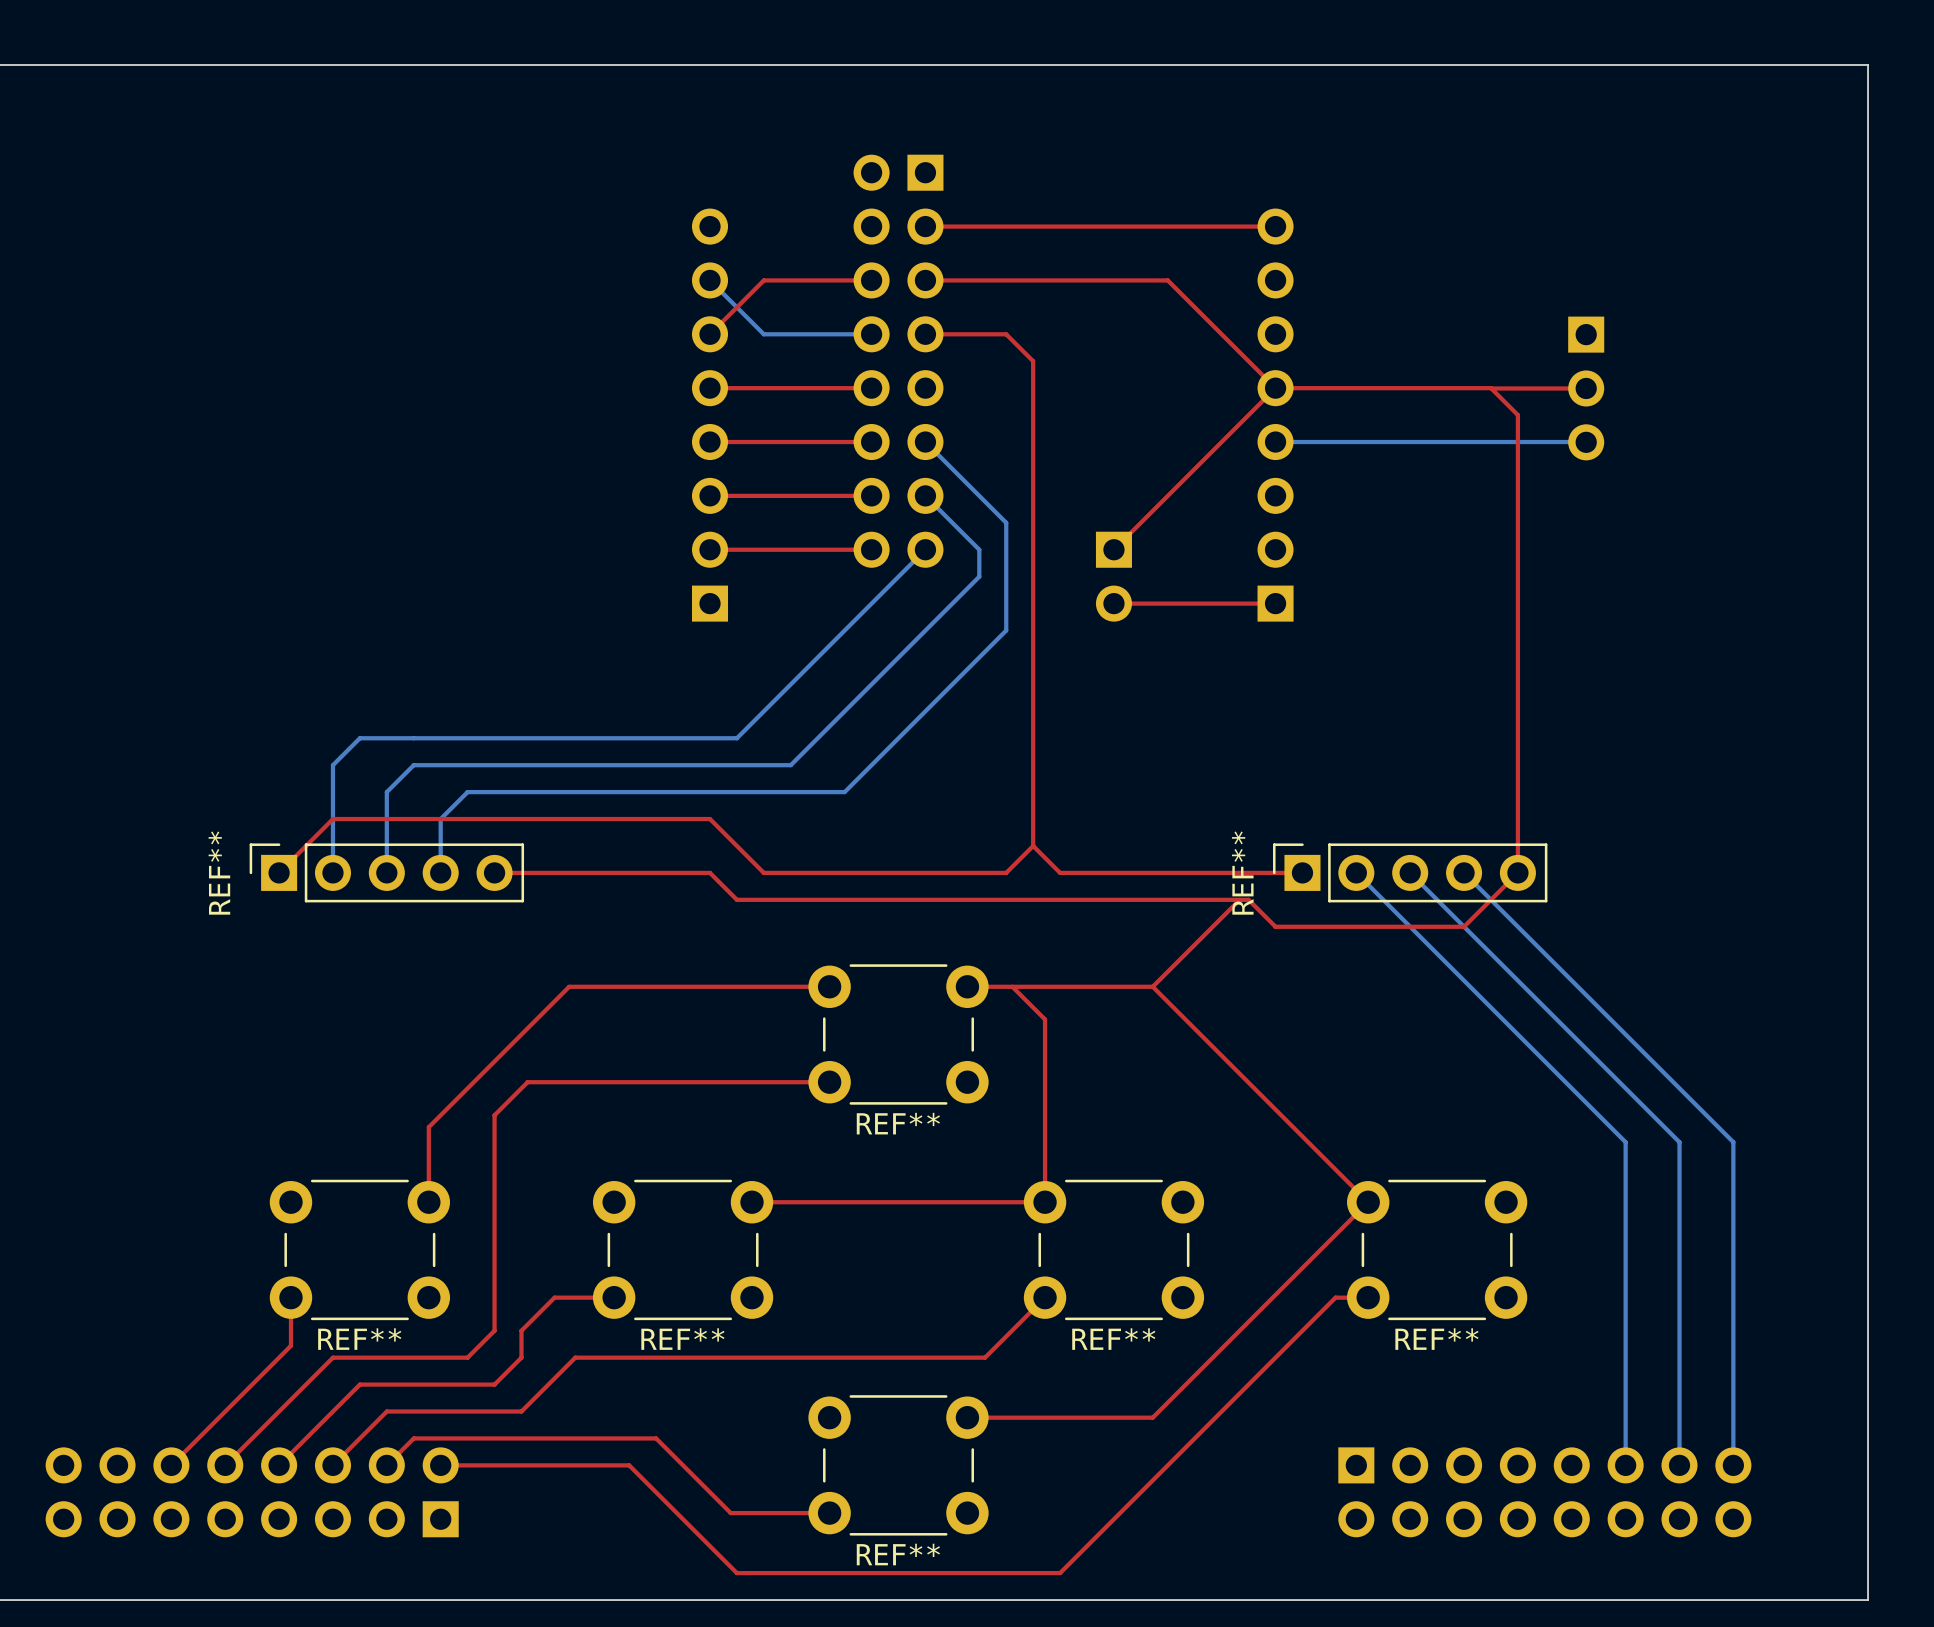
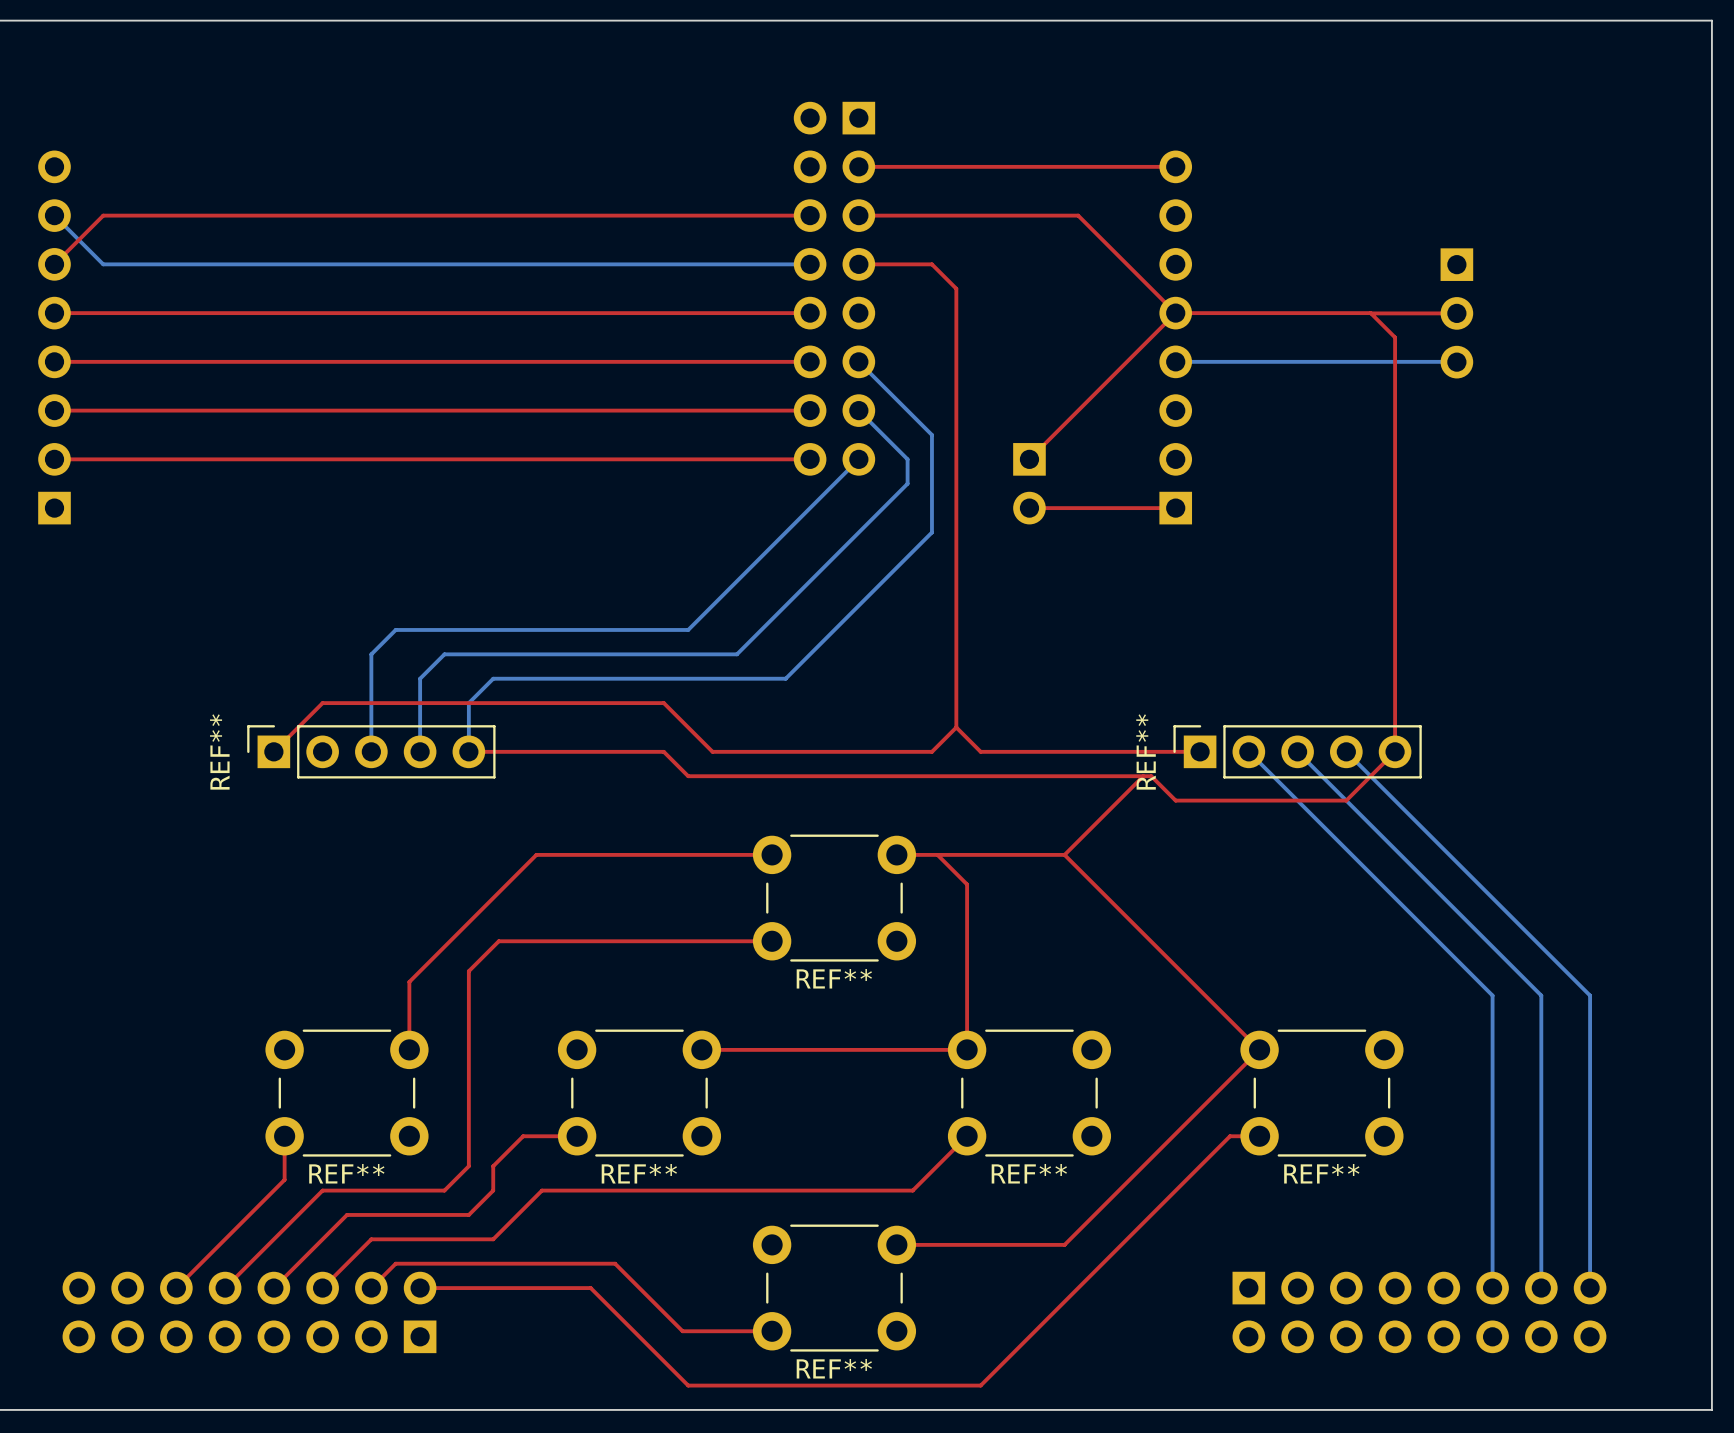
bottom track: (710, 280) (763, 334) -> (54, 215) (103, 264) (712, 264)
top track: (763, 280) (710, 334) -> (712, 215) (103, 215) (54, 264)
top track: none -> (54, 313) (663, 313)
part: none -> (54, 337)
part: (710, 415) -> none
top track: none -> (54, 361) (663, 361)
top track: none -> (54, 410) (663, 410)
top track: none -> (54, 459) (663, 459)
bottom track: (413, 738) (359, 738) (332, 765) (332, 872) -> none
bottom track: (467, 765) (413, 765) (386, 792) -> (395, 629) (371, 654) (371, 678)
bottom track: (521, 792) (467, 792) (440, 819) -> (444, 654) (420, 678) (420, 703)
bottom track: none -> (493, 678) (468, 703) (468, 751)

